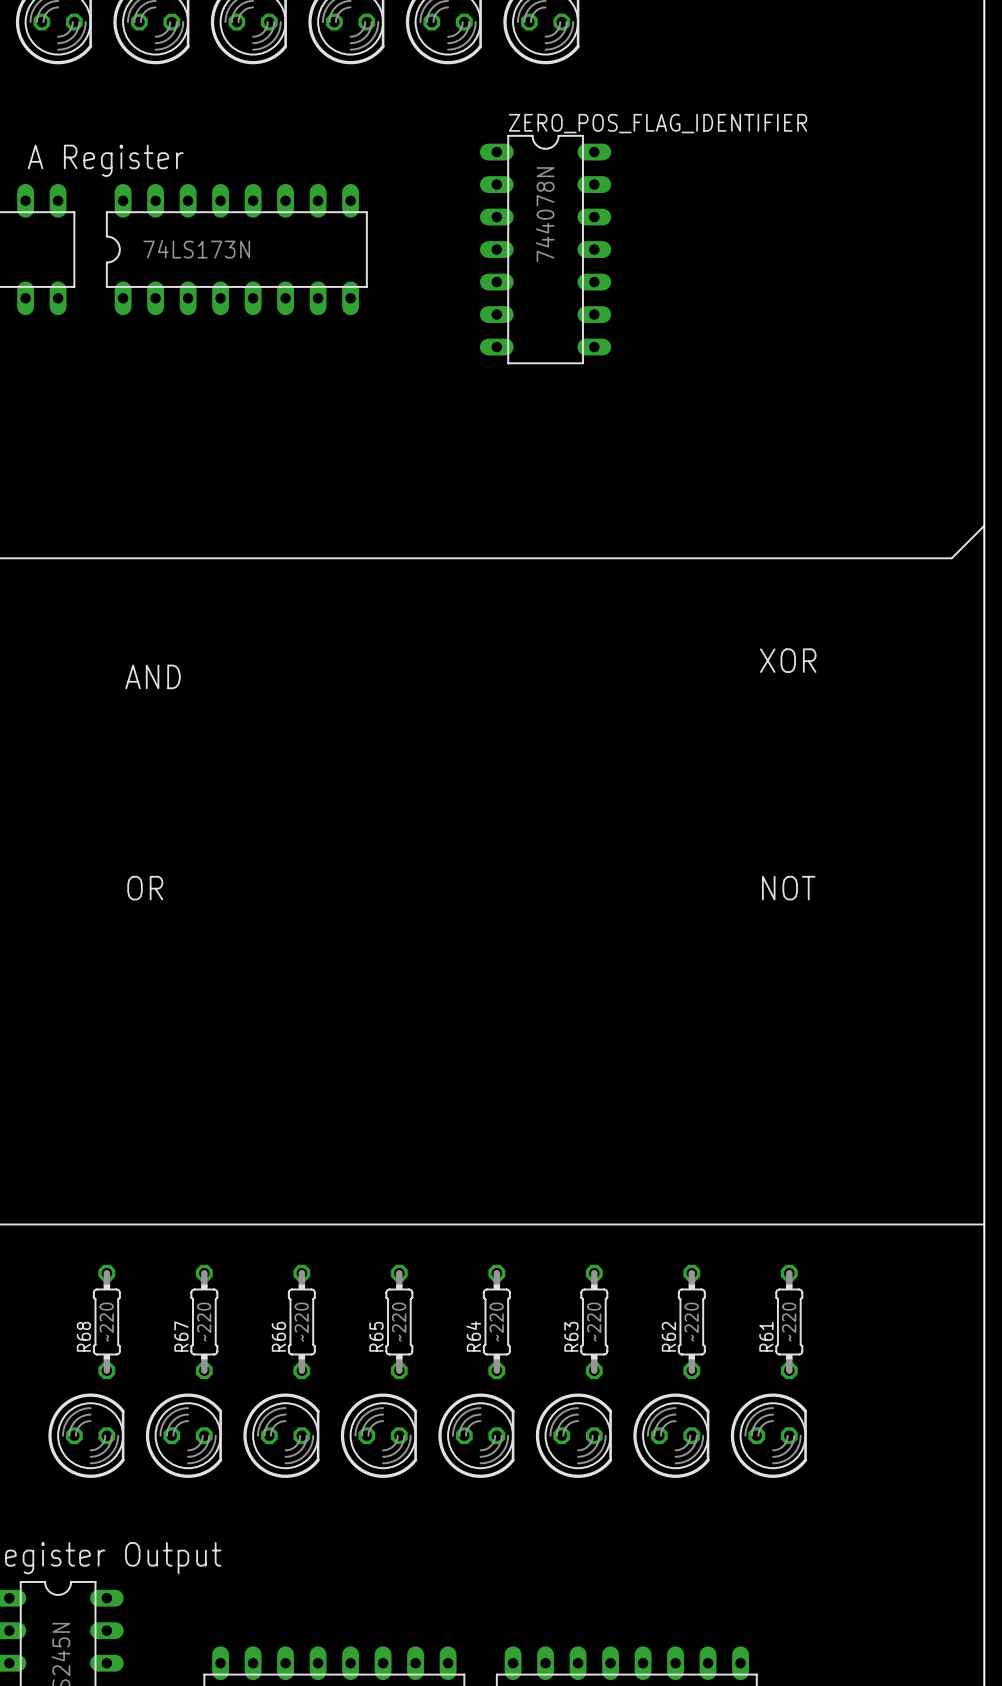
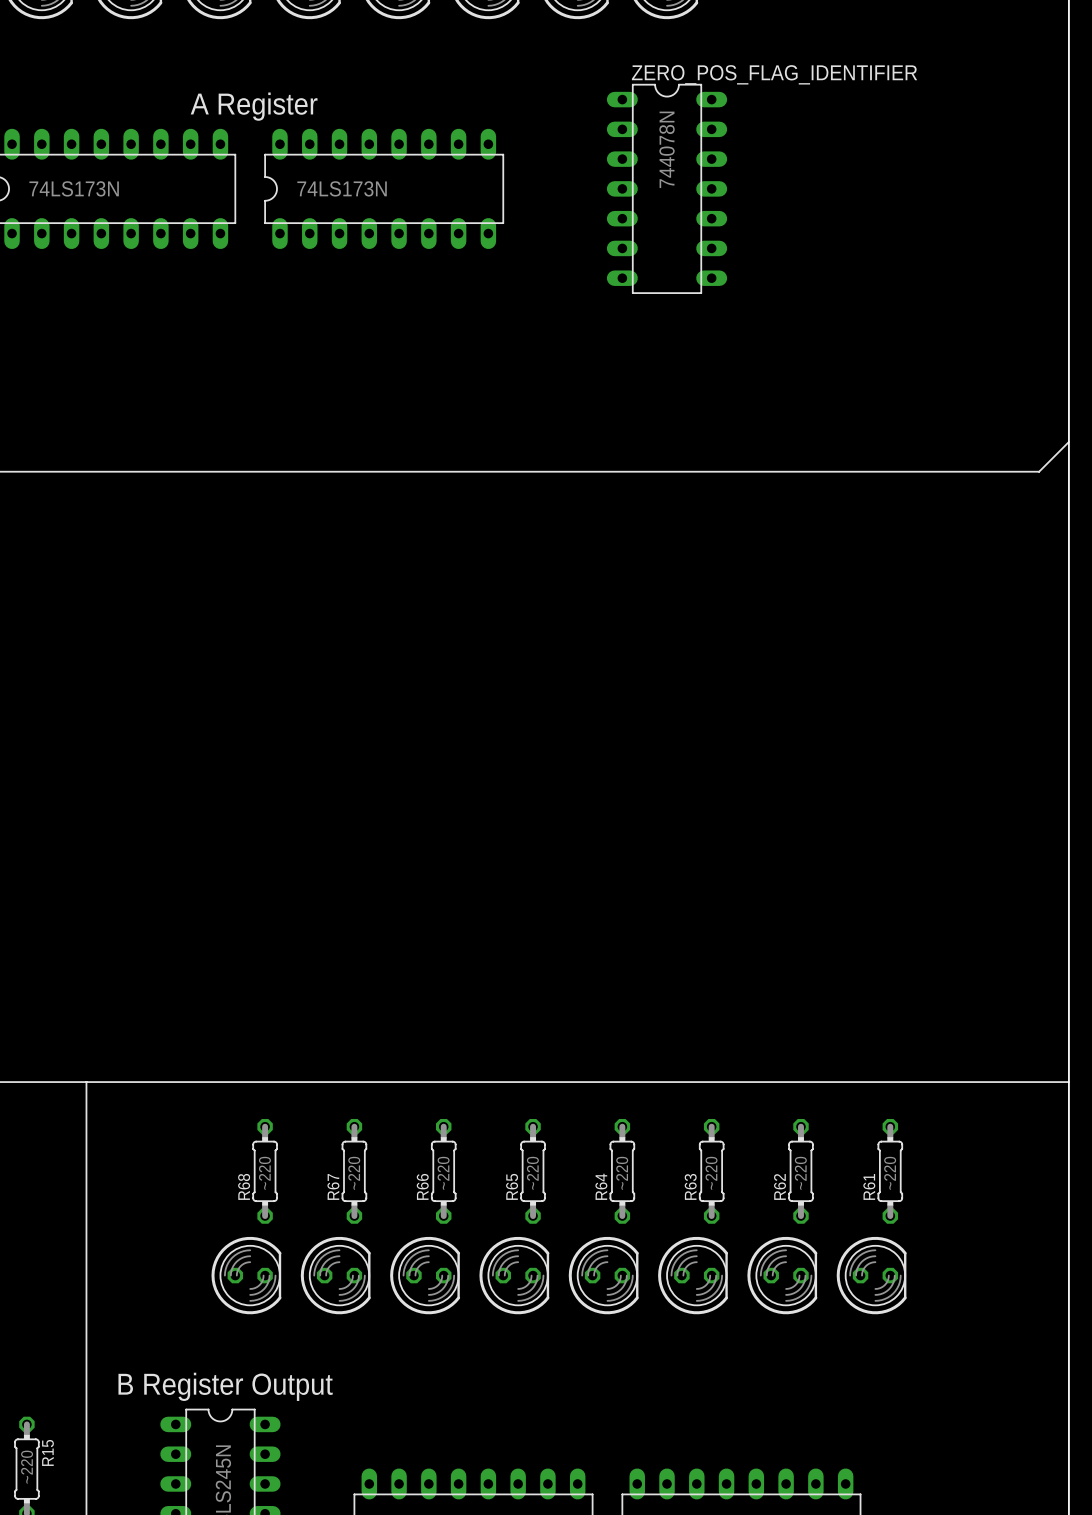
text: XOR (788, 660) -> none
text: AND (153, 676) -> none
text: OR (145, 888) -> none
text: NOT (788, 888) -> none

